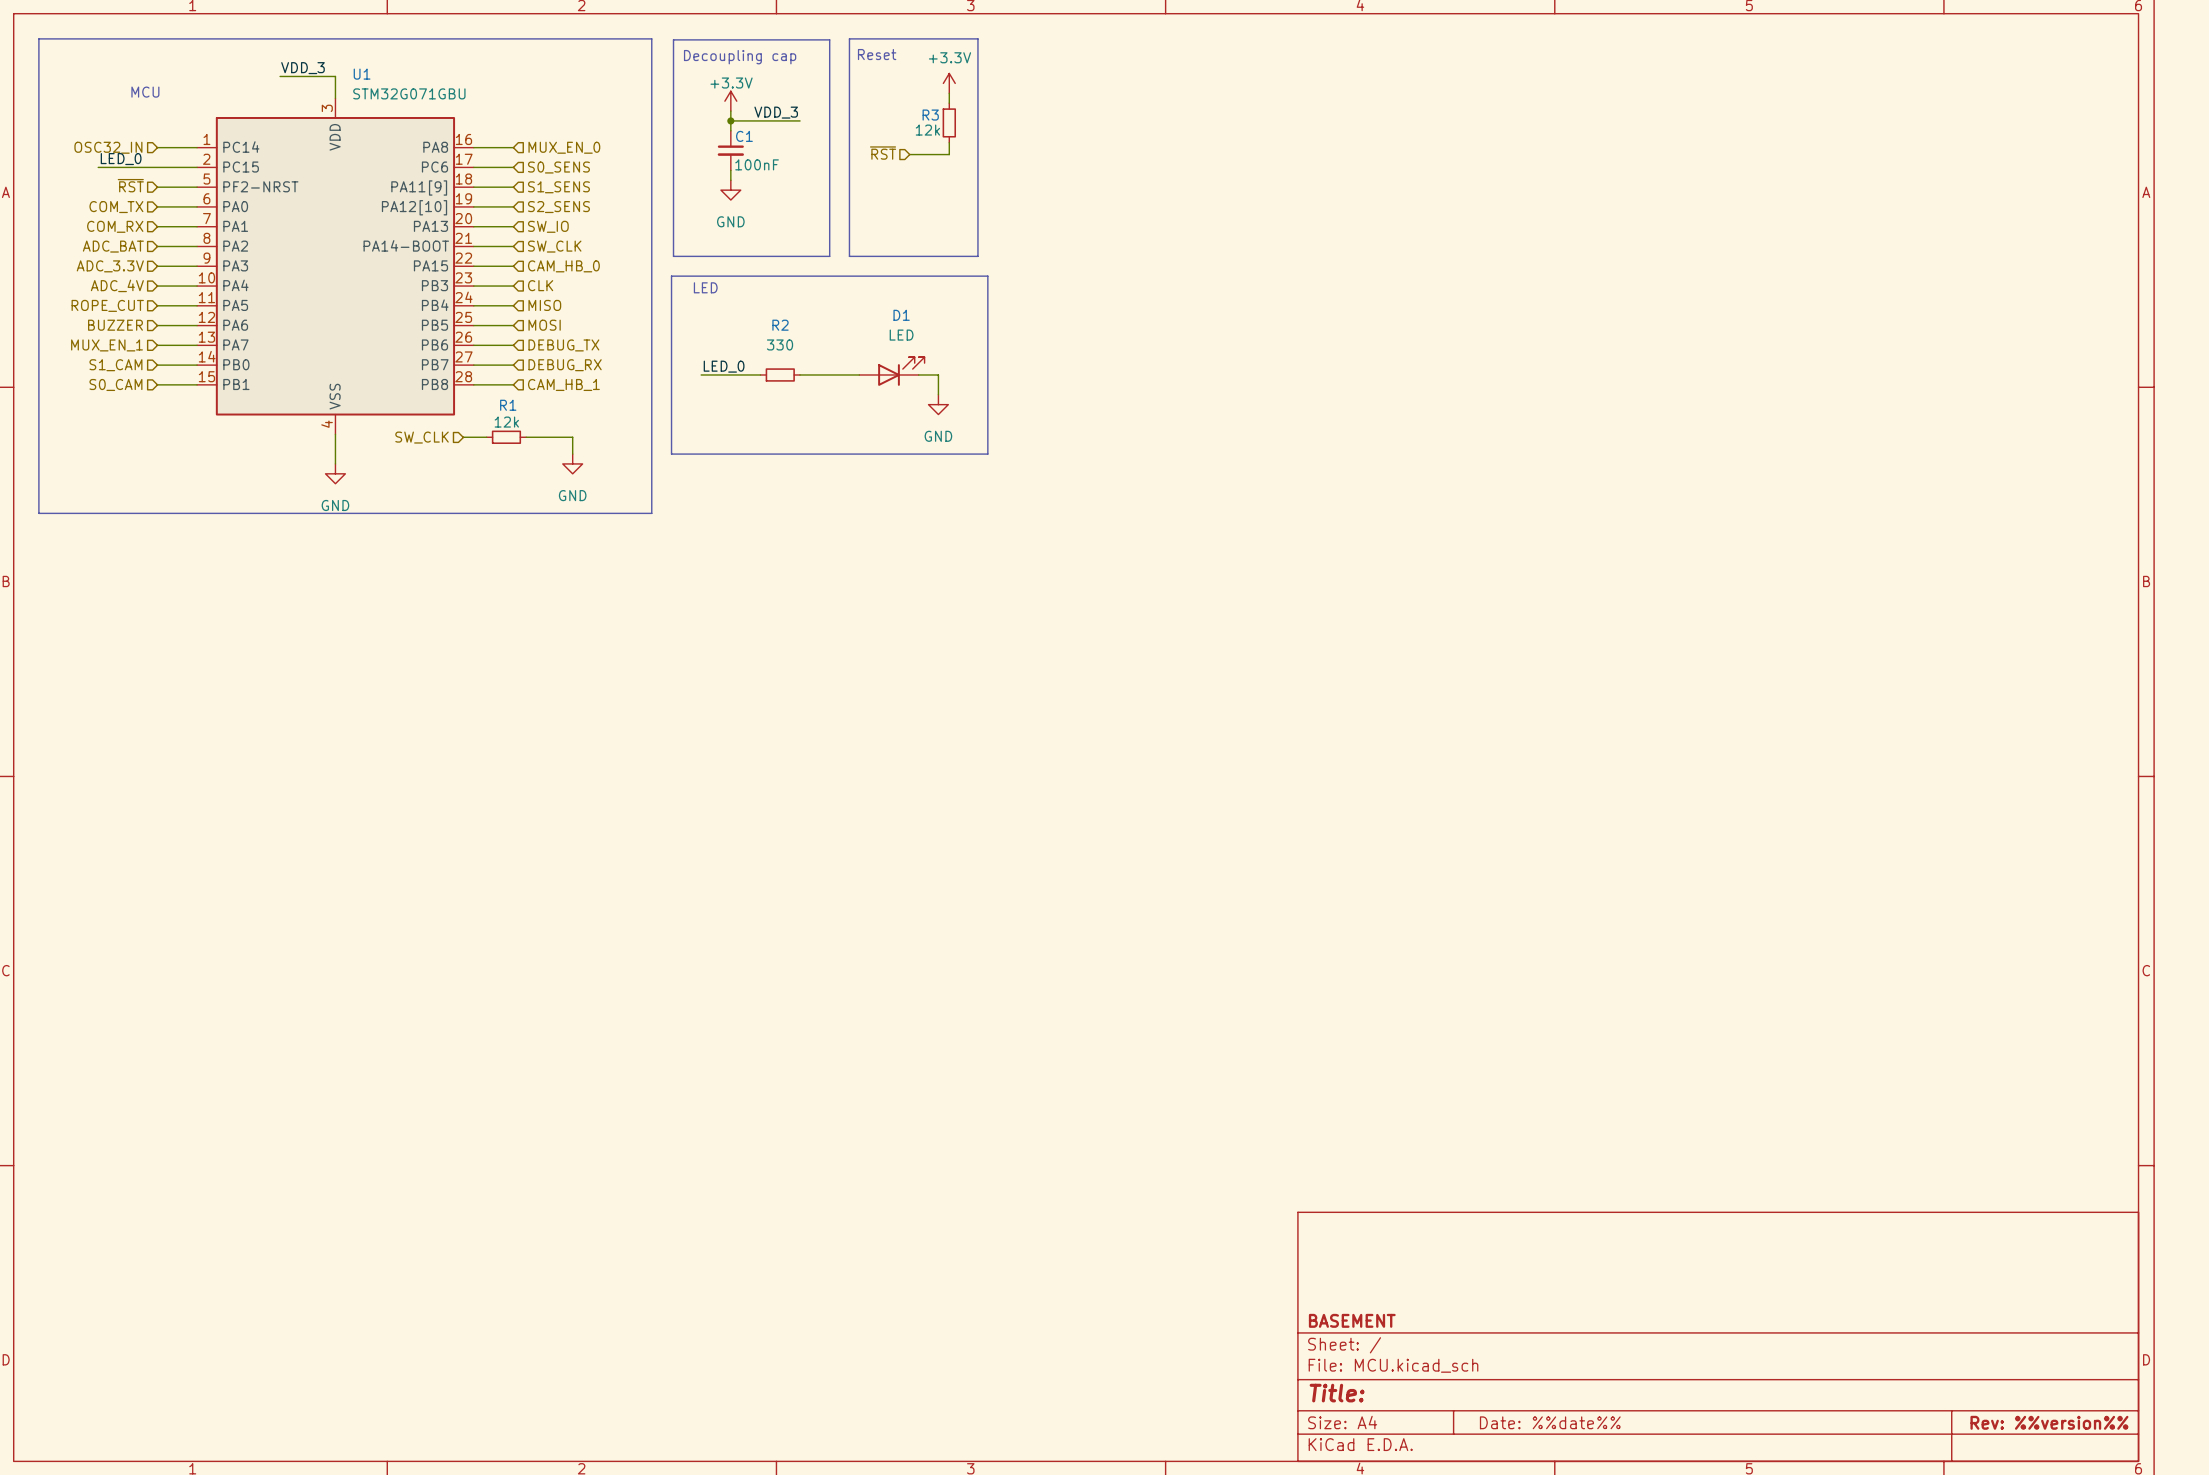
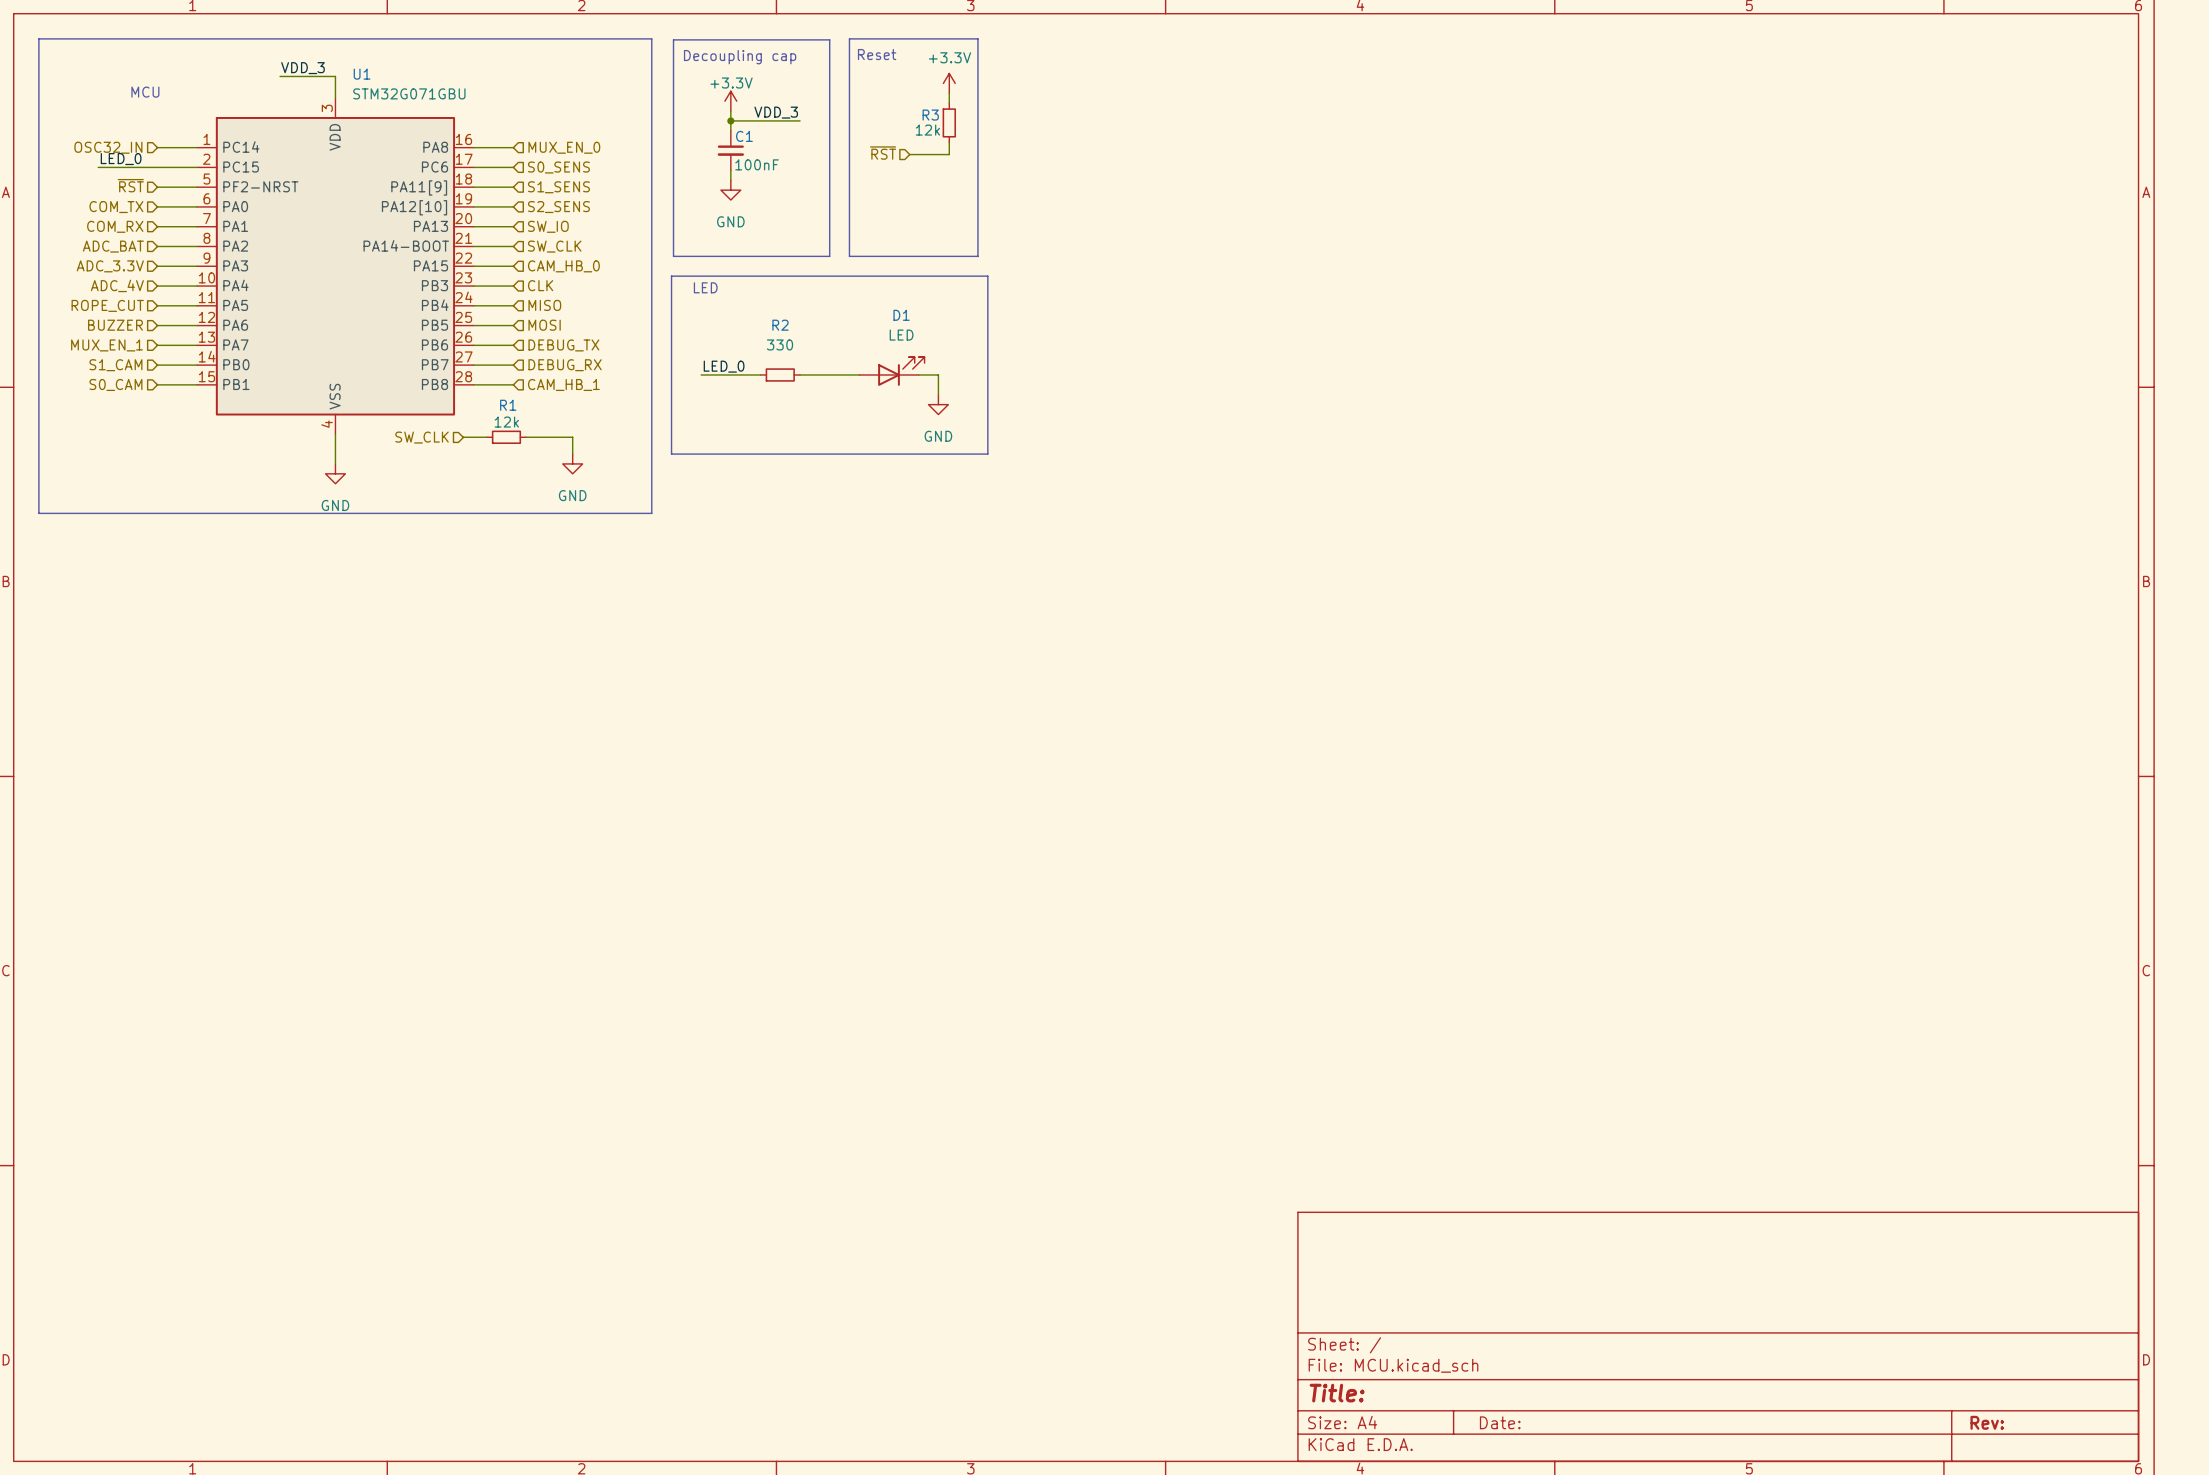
title block: BASEMENT (1352, 1320) -> none
title block: Date: %%date%% (1550, 1422) -> Date: (1500, 1422)
title block: Rev: %%version%% (2049, 1422) -> Rev: (1987, 1422)

